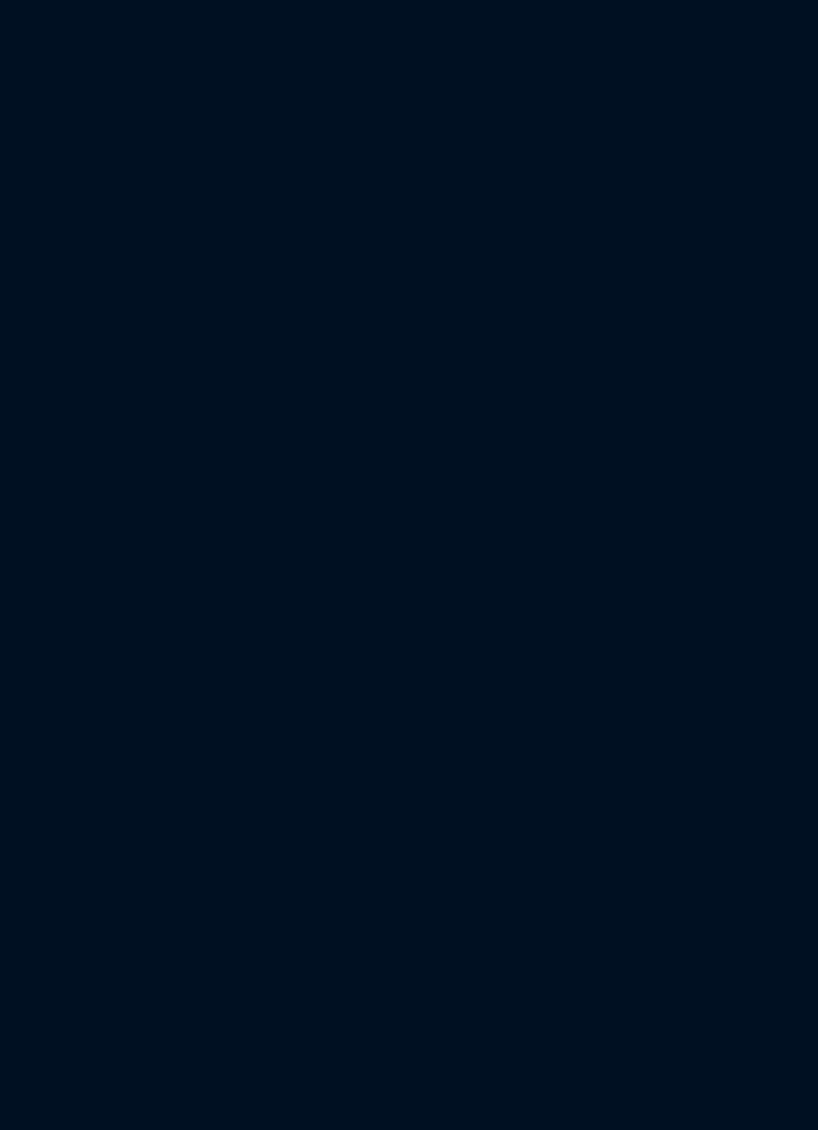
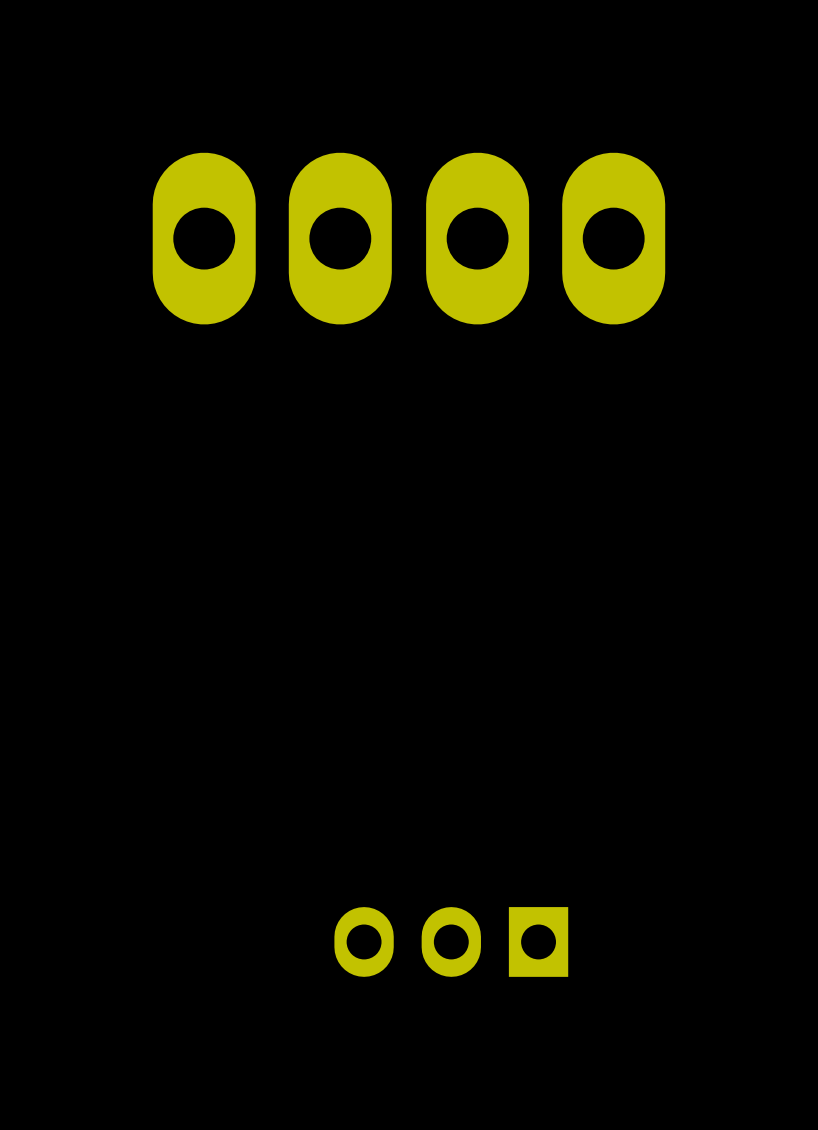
part: none -> (272, 238)
part: none -> (545, 238)
part: none -> (451, 941)

